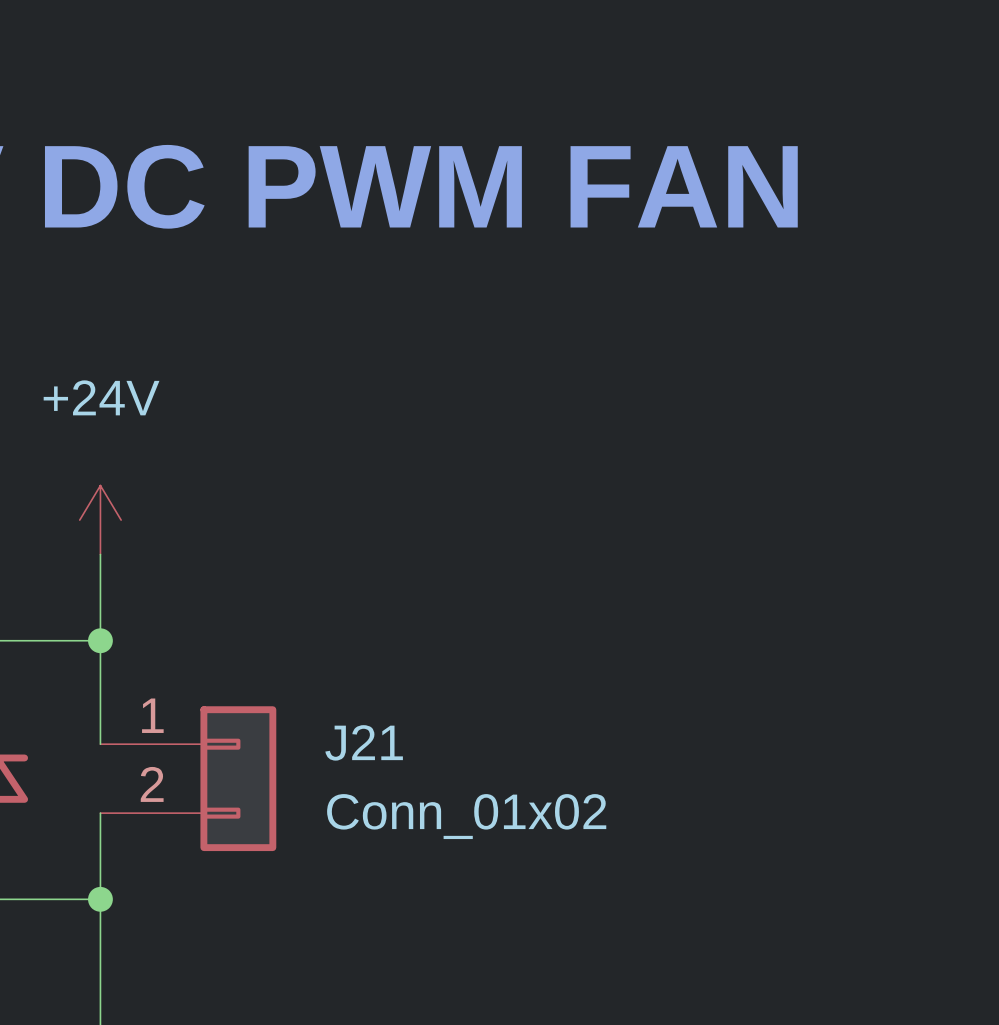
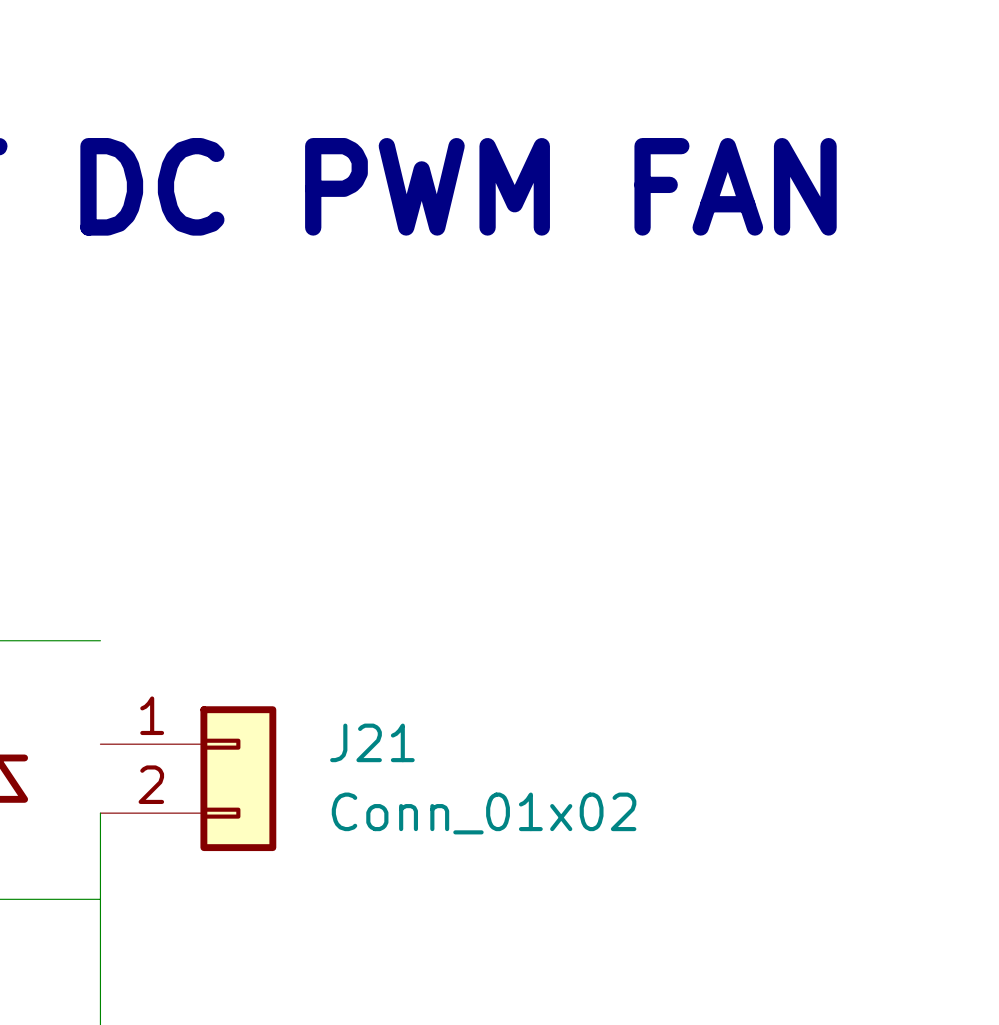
power symbol: +24V (100, 520) -> none
wire: (100, 554) (100, 744) -> none
junction: (100, 640) -> none
junction: (100, 899) -> none

